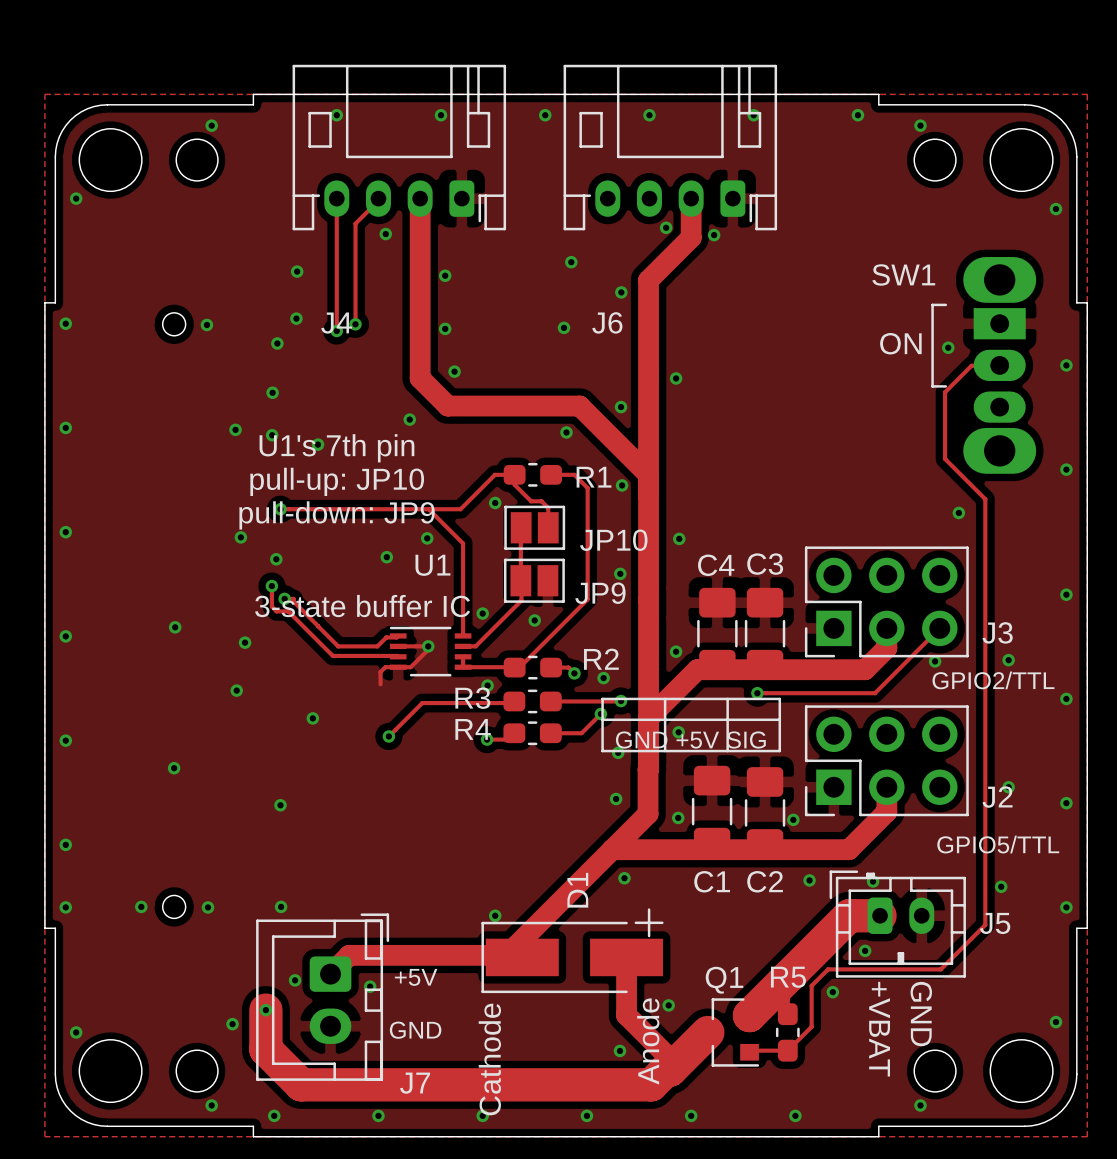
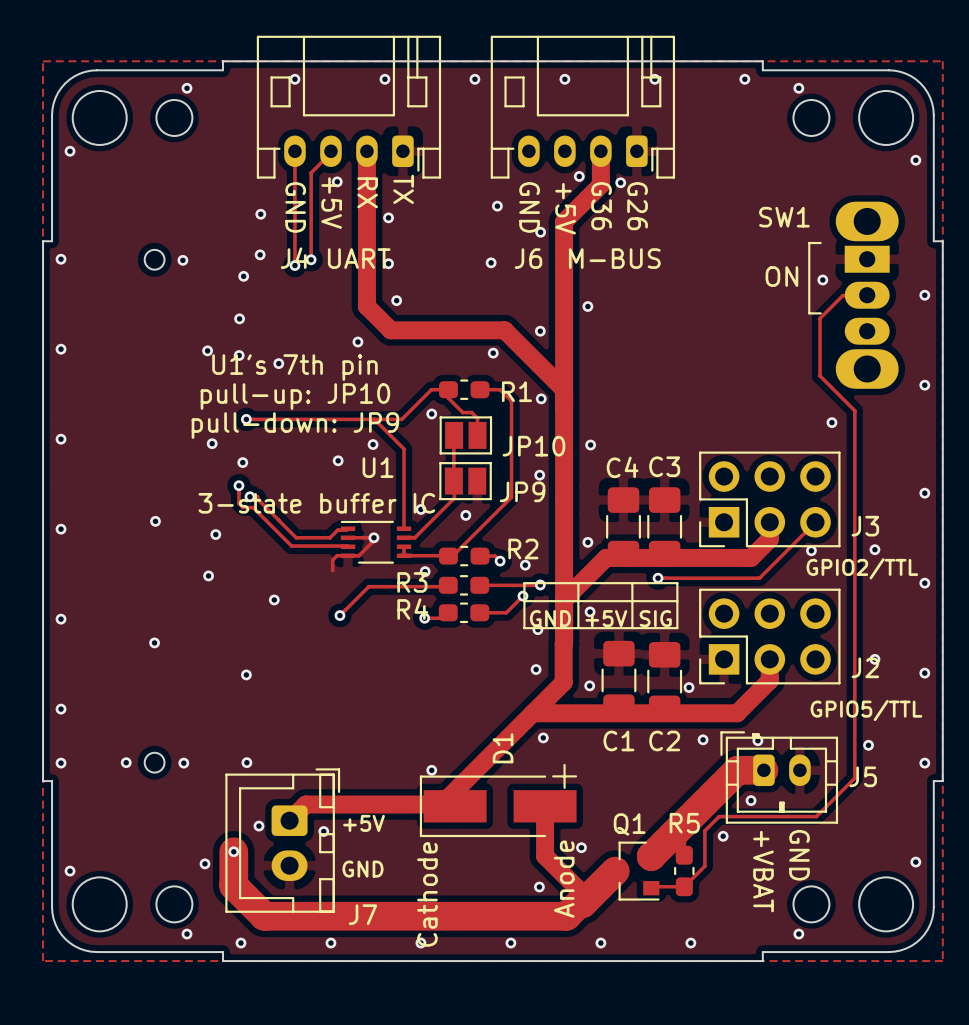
text: none -> TX (403, 189)
text: none -> RX (367, 192)
text: none -> +5V (331, 203)
text: none -> +5V (565, 208)
text: none -> G36 (601, 206)
text: none -> G26 (637, 206)
text: none -> GND (295, 207)
text: none -> GND (529, 207)
text: none -> M-BUS (614, 258)
text: none -> UART (359, 258)

